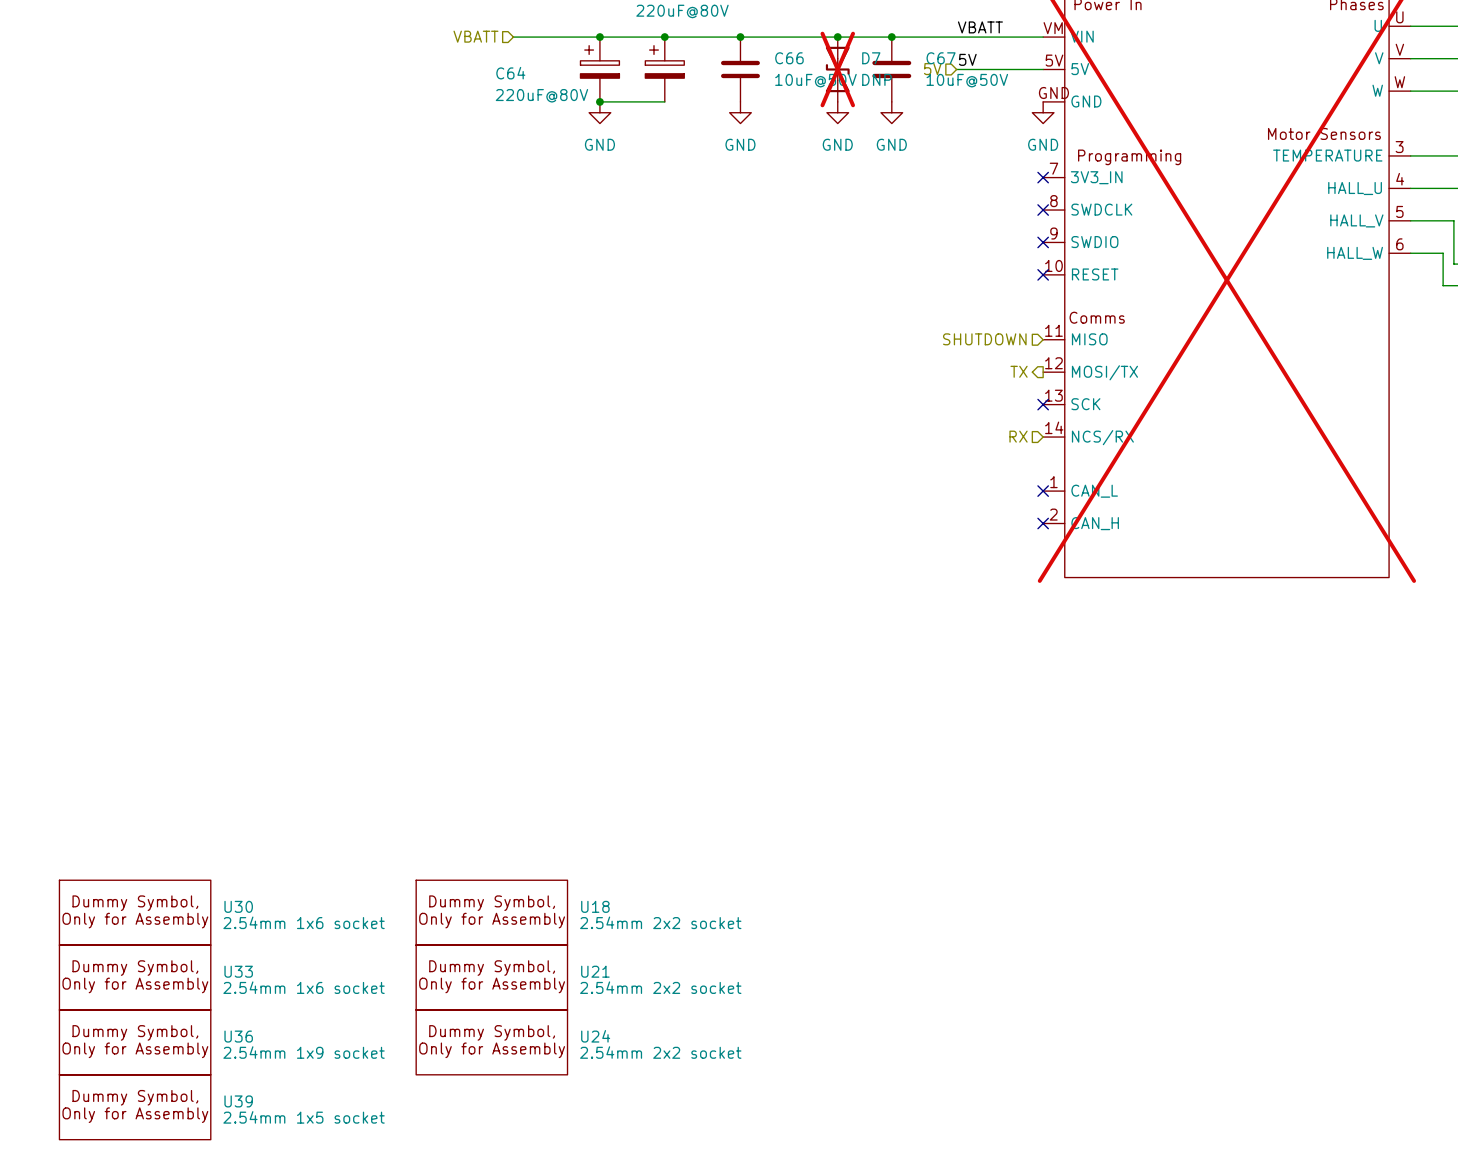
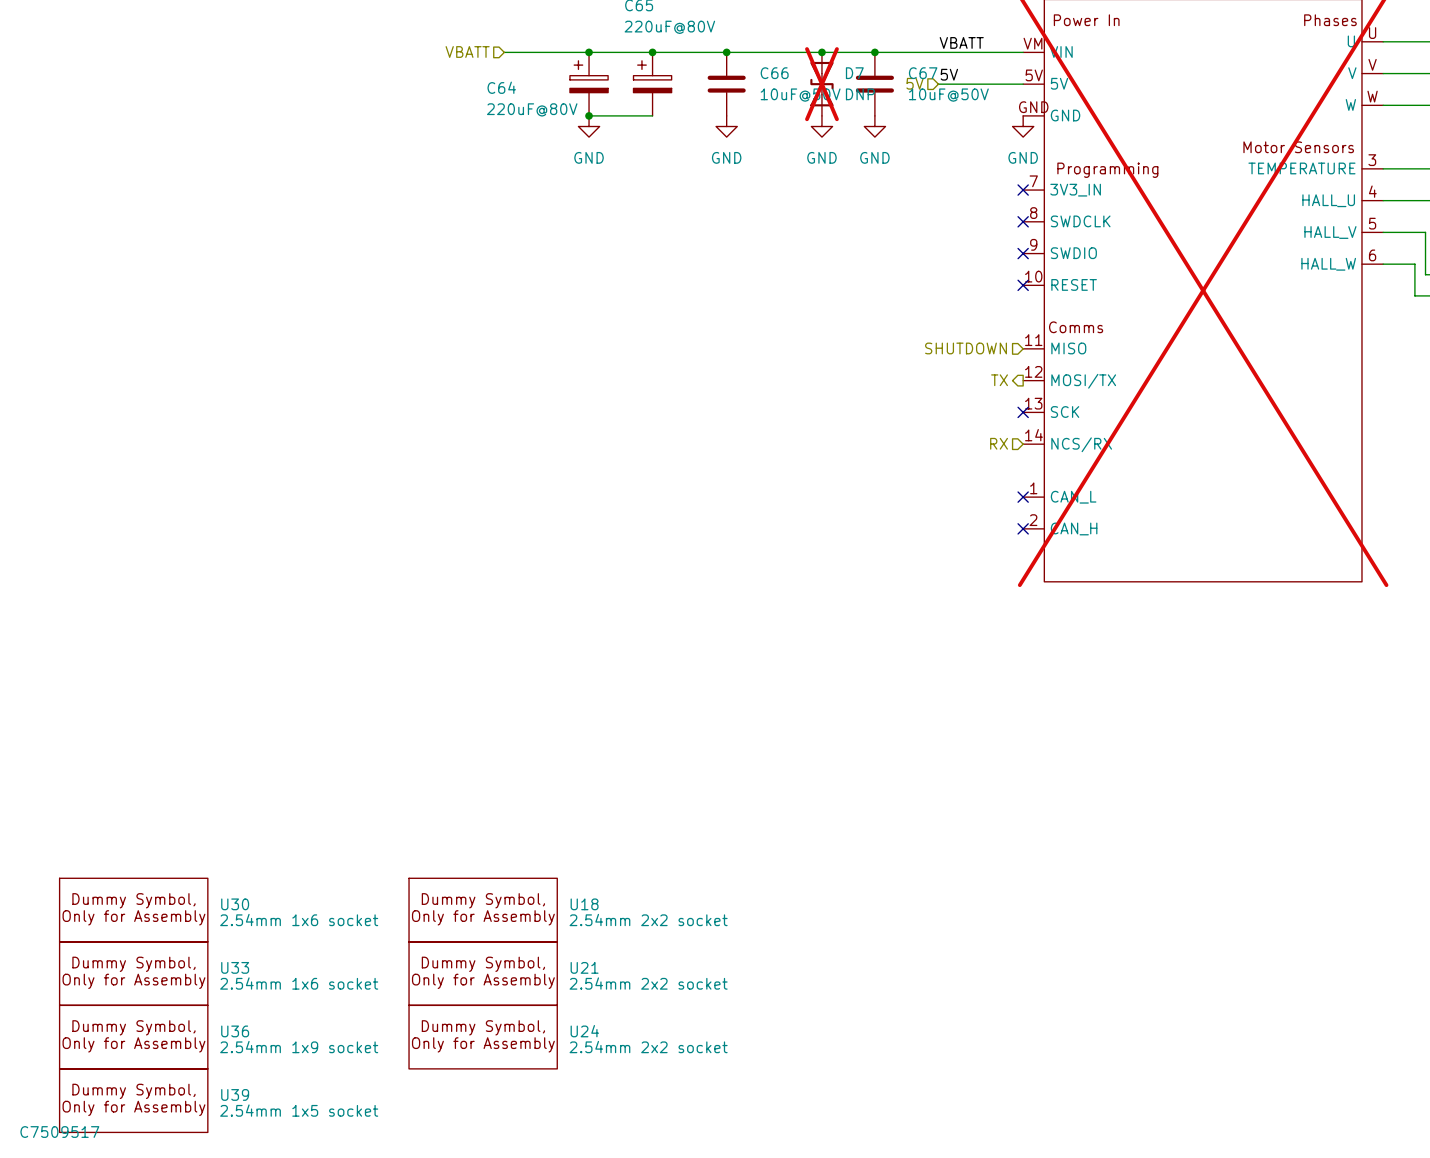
U39 text: none -> C7509517 (59, 1132)

